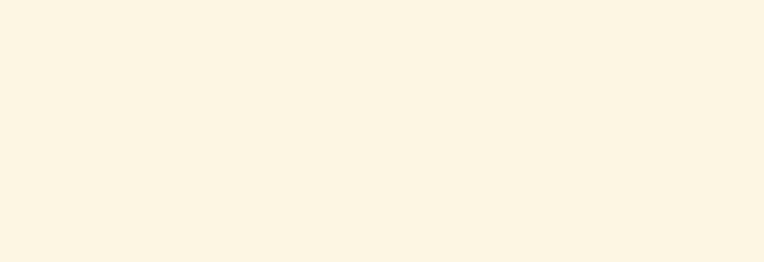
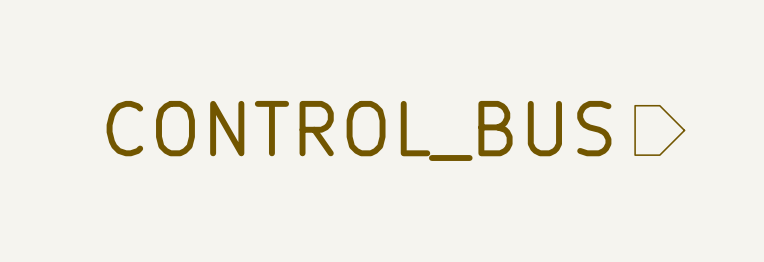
hierarchical label: none -> CONTROL_BUS (359, 130)

